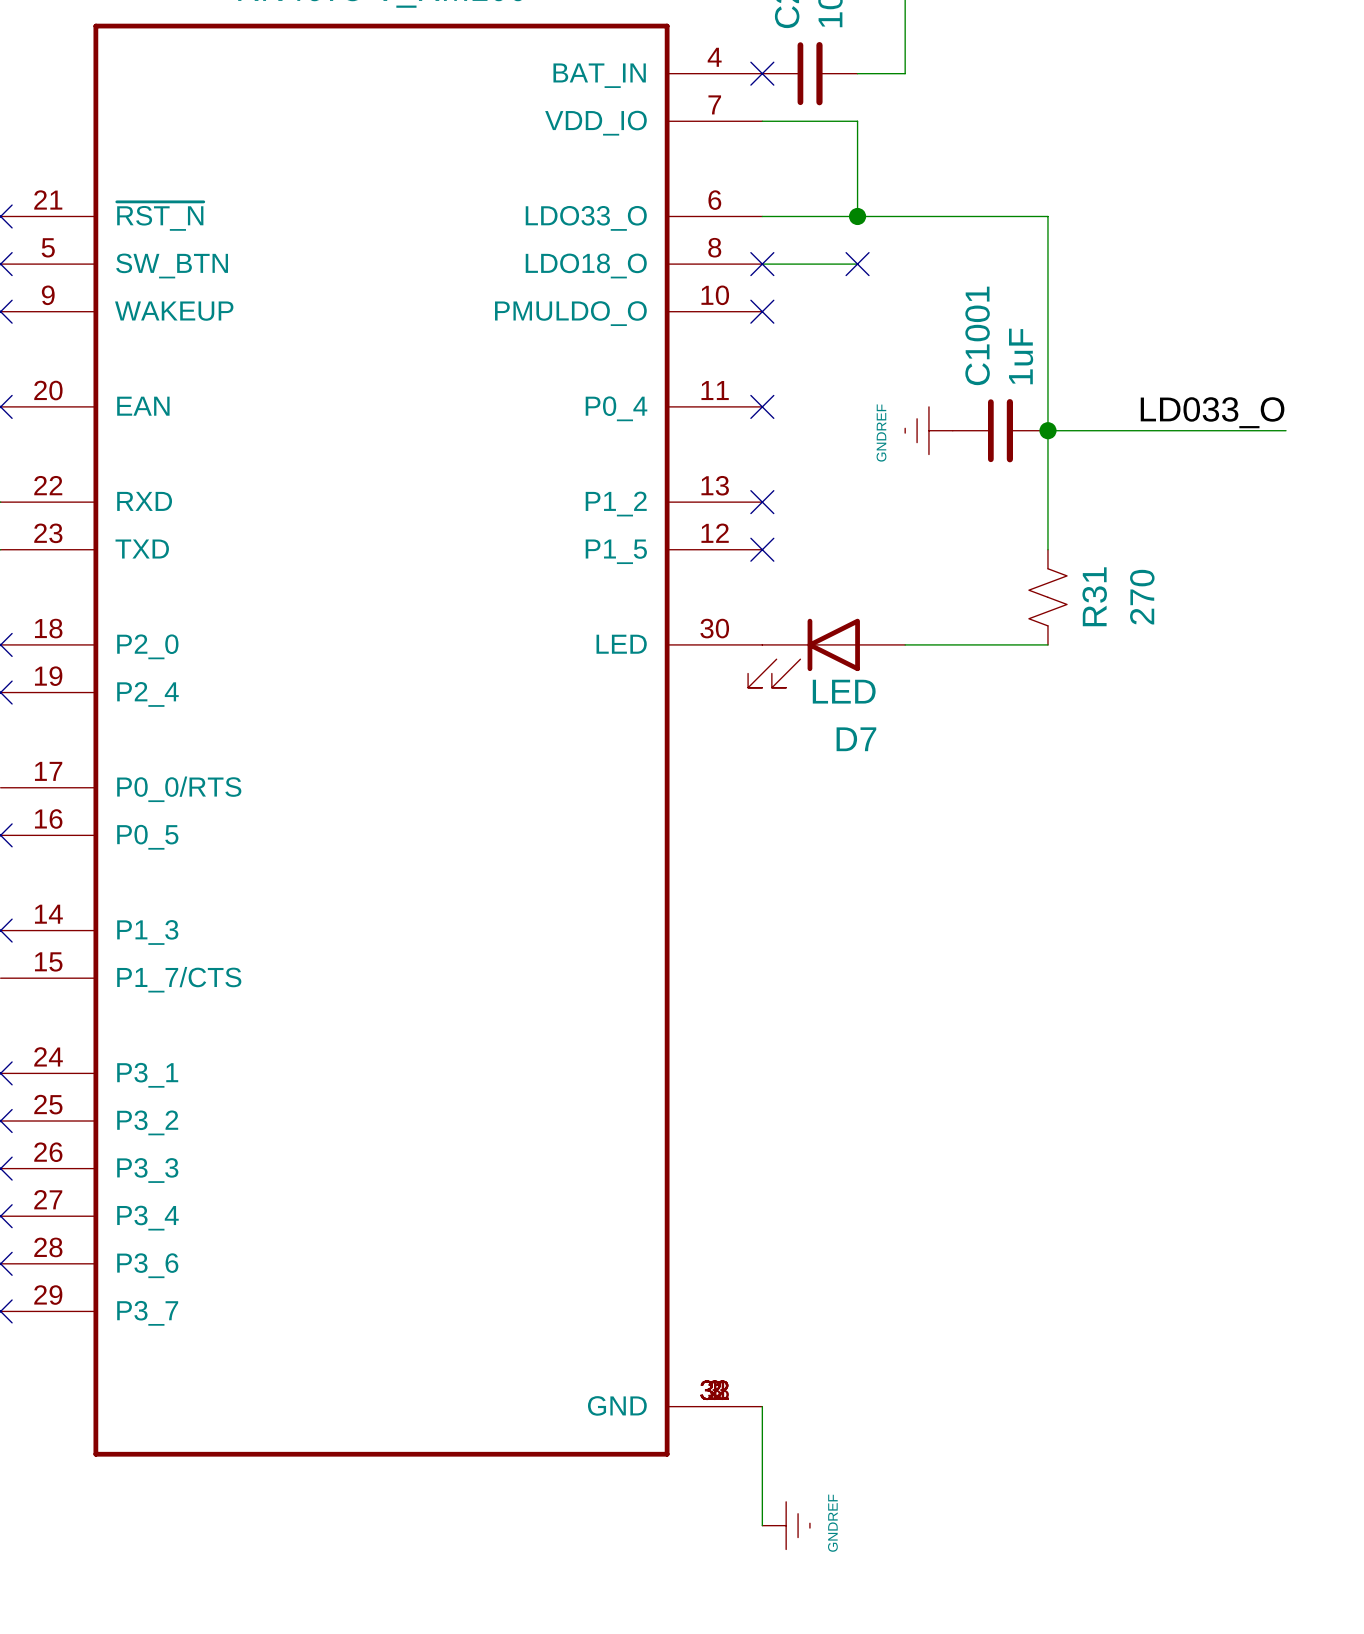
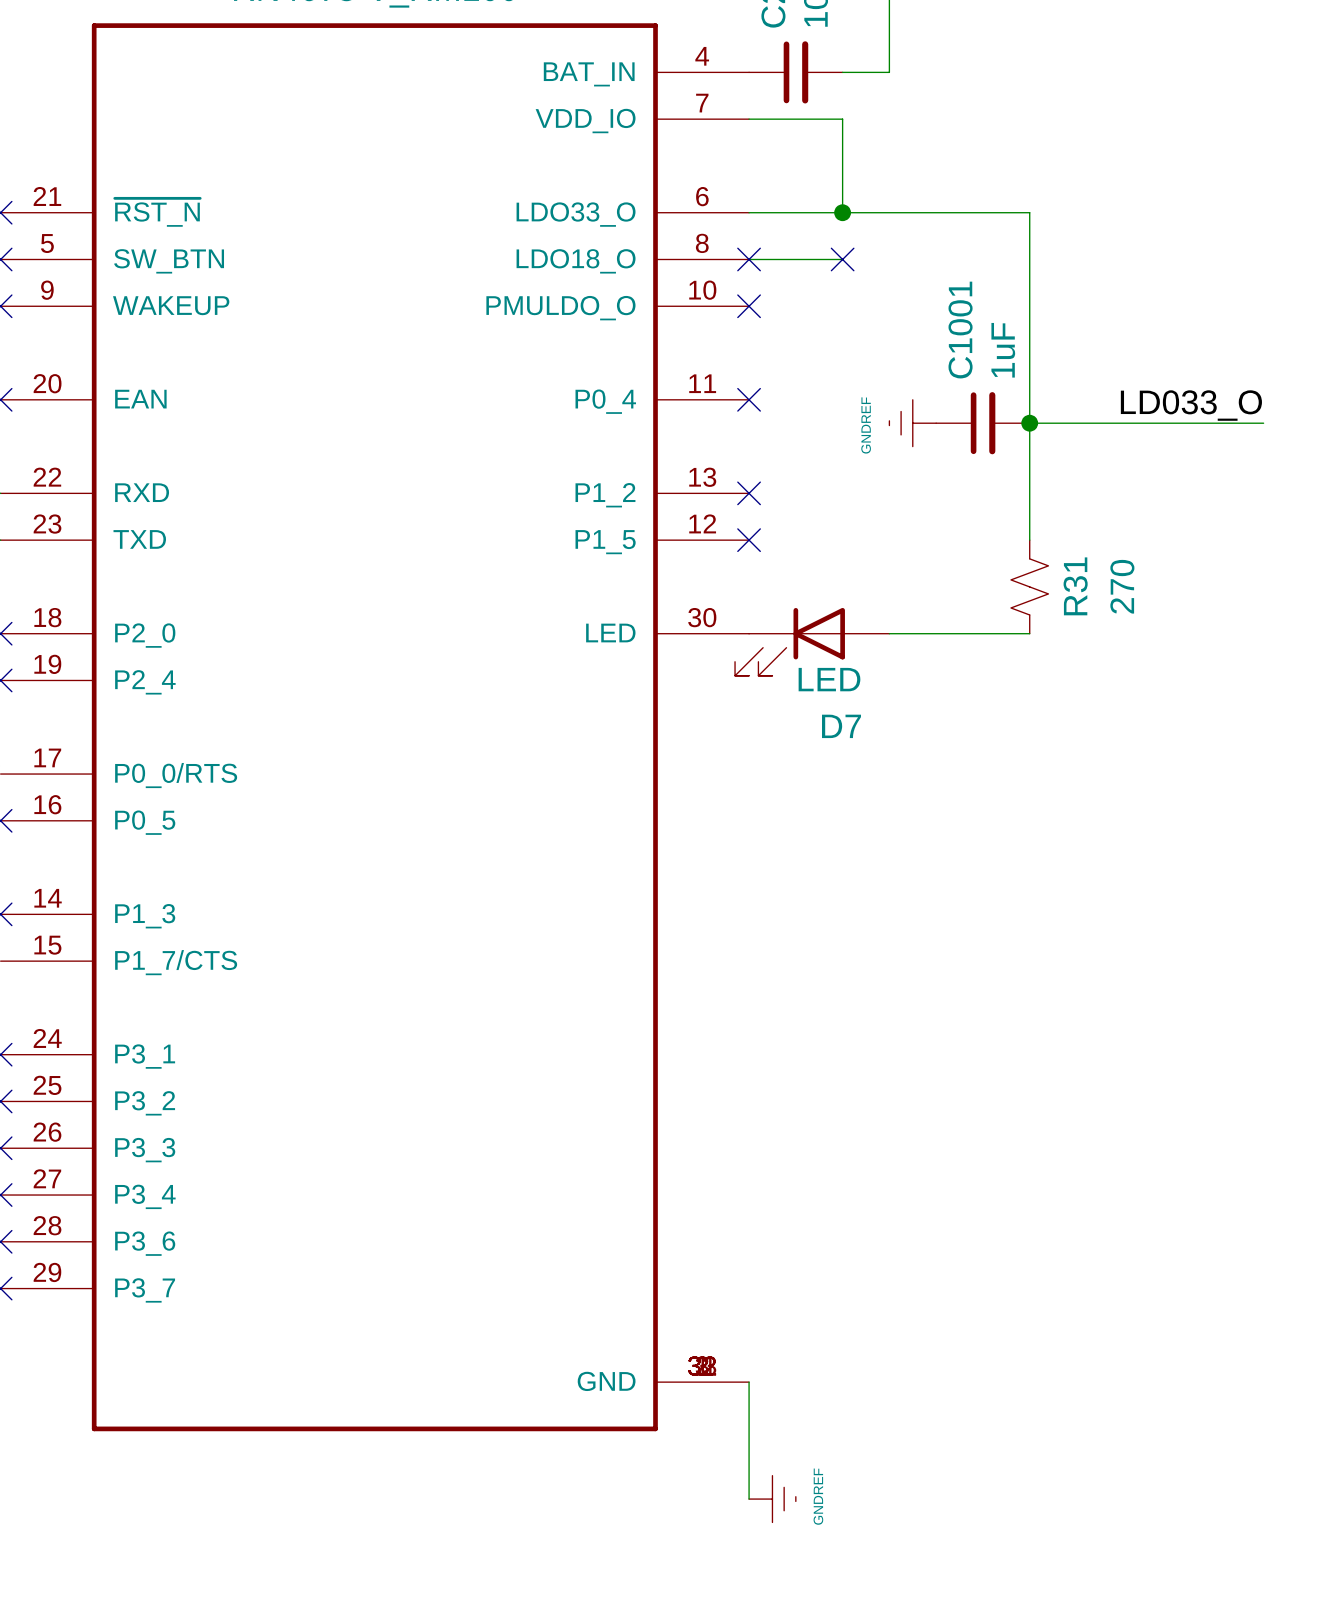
no-connect mark: (762, 73) -> none

